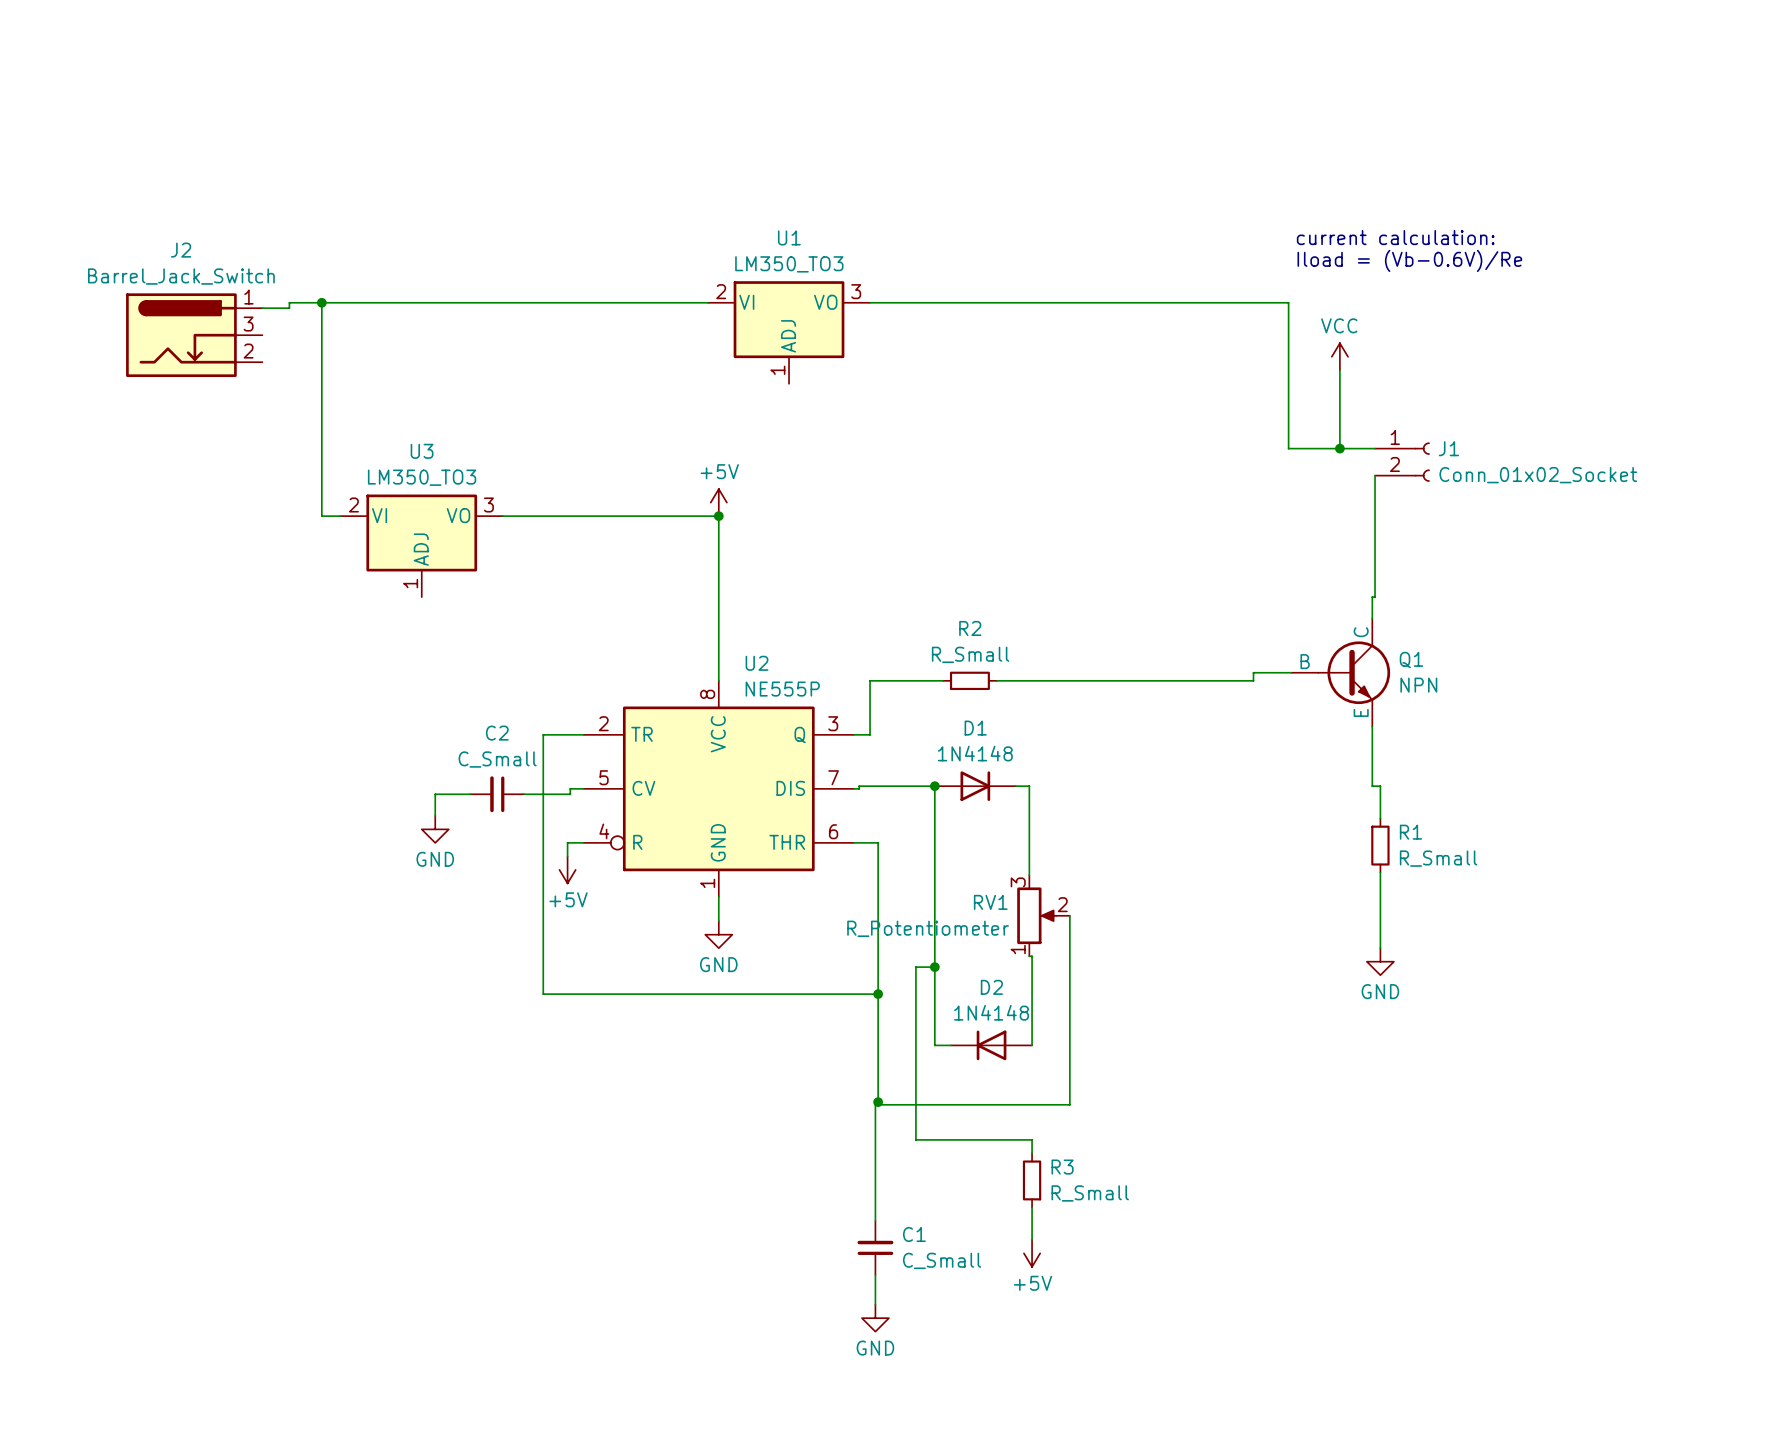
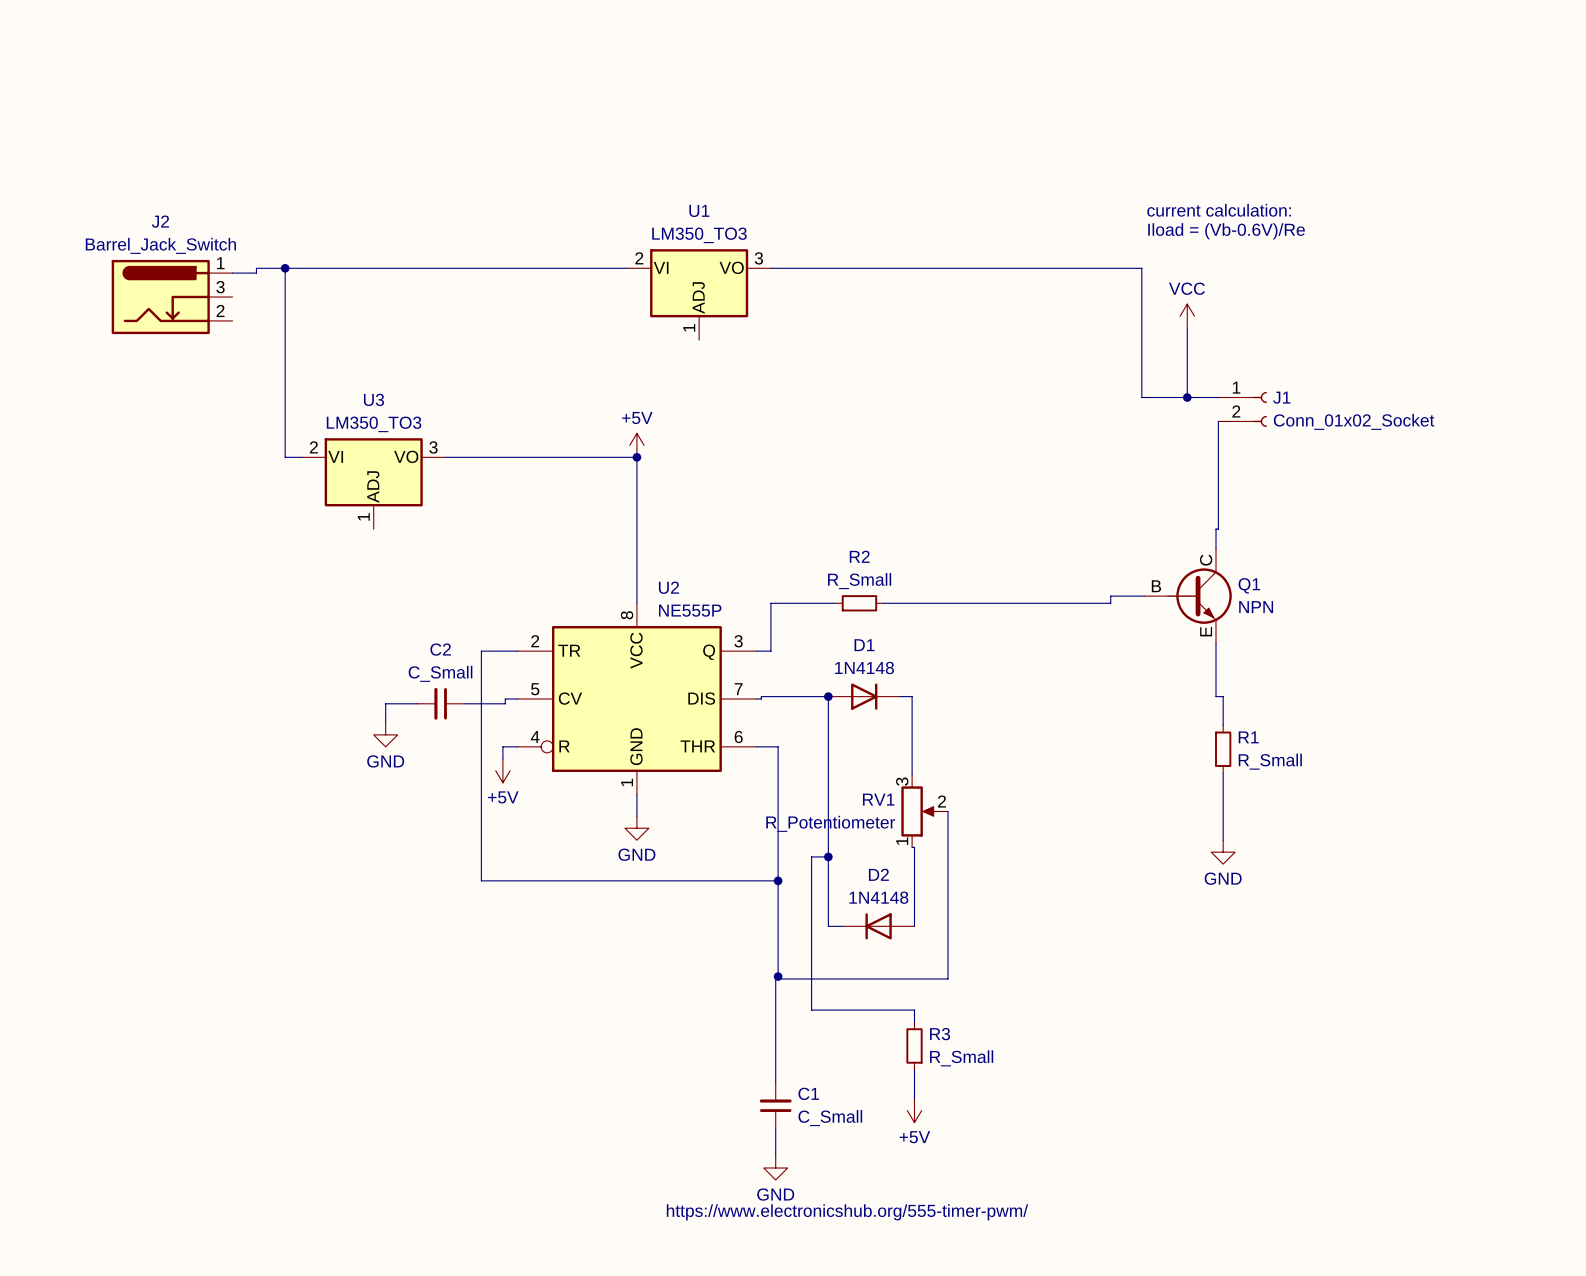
text: none -> https://www.electronicshub.org/555-timer-pwm/ (847, 1212)

